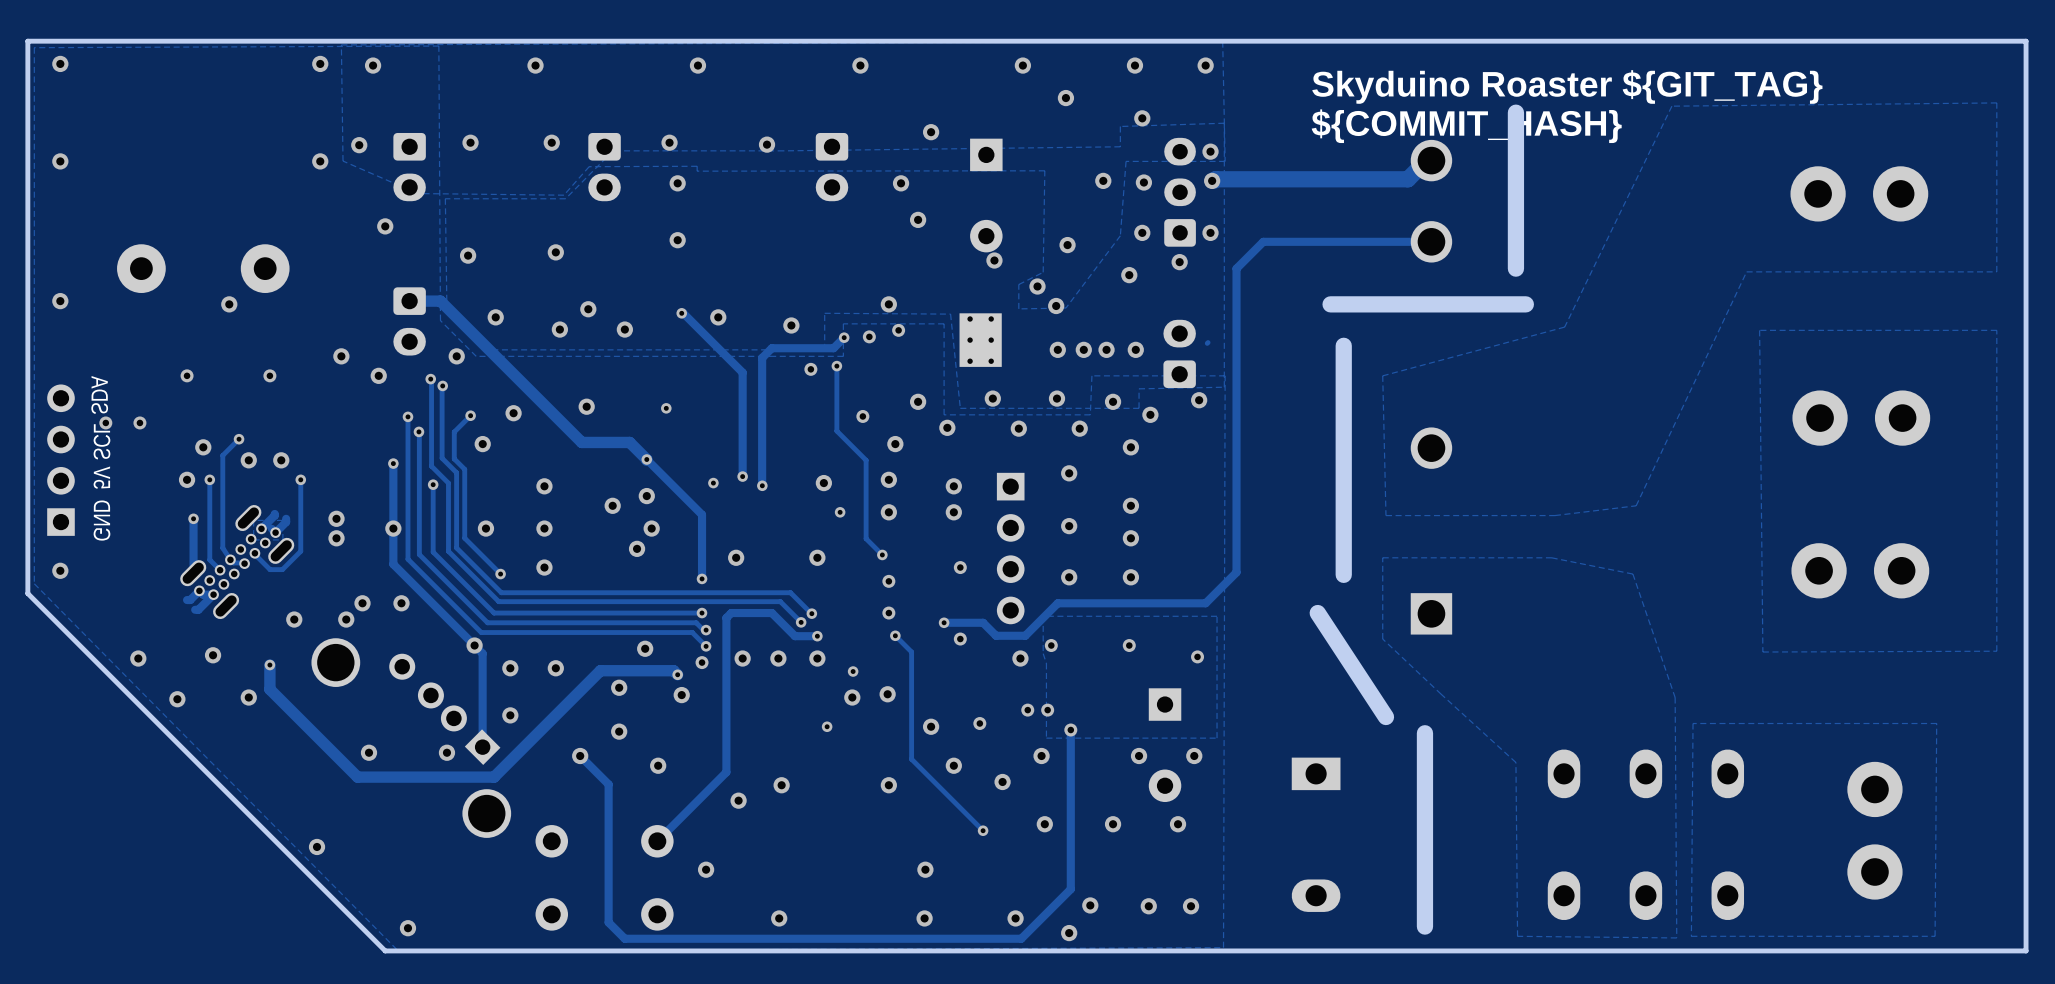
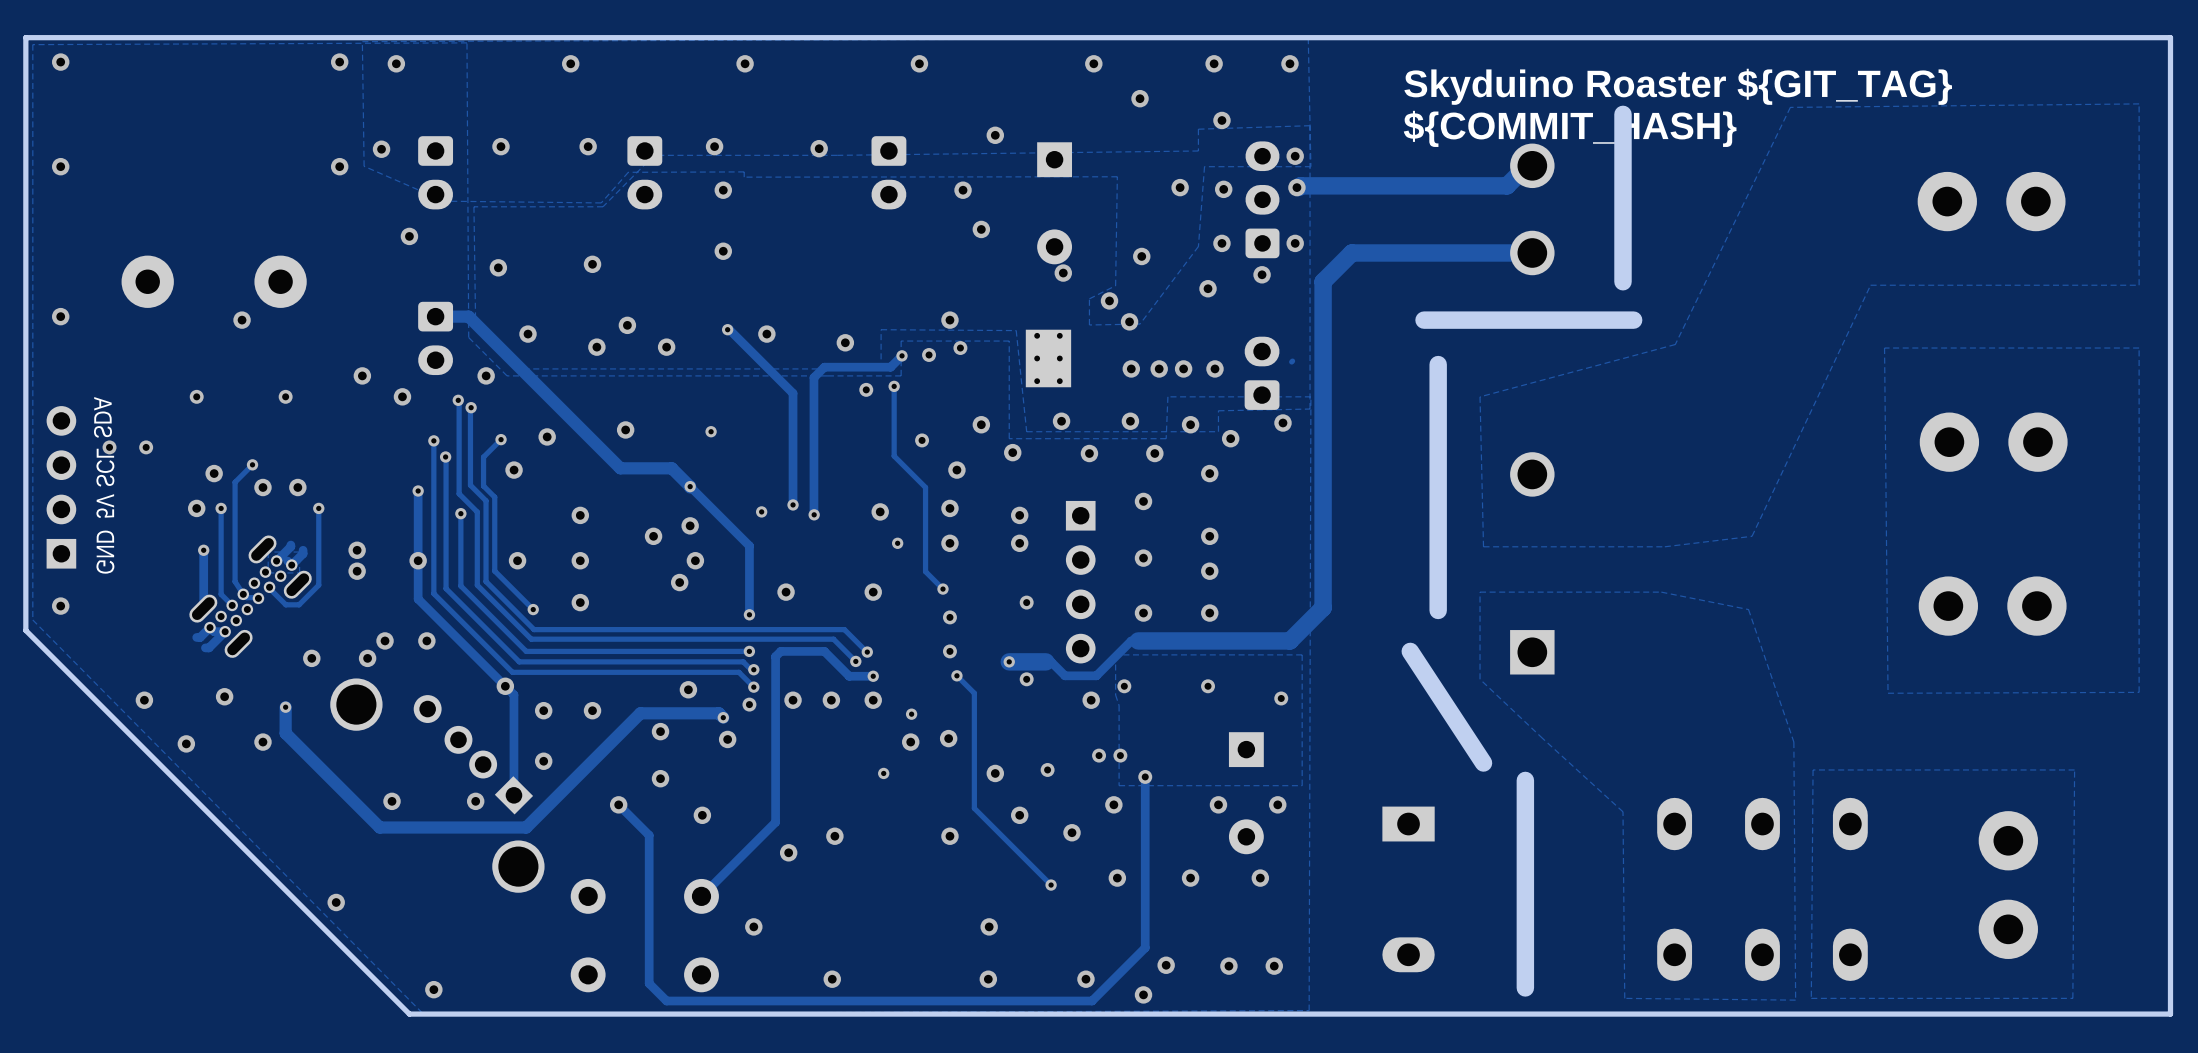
track width: thin (1431, 241) (1263, 241) (1236, 268) (1236, 572) (1205, 603) (1064, 603) -> thick (1532, 252) (1351, 252) (1323, 281) (1323, 607) (1289, 640) (1138, 640)
track width: thin (978, 622) (944, 622) -> thick (1045, 661) (1009, 661)

